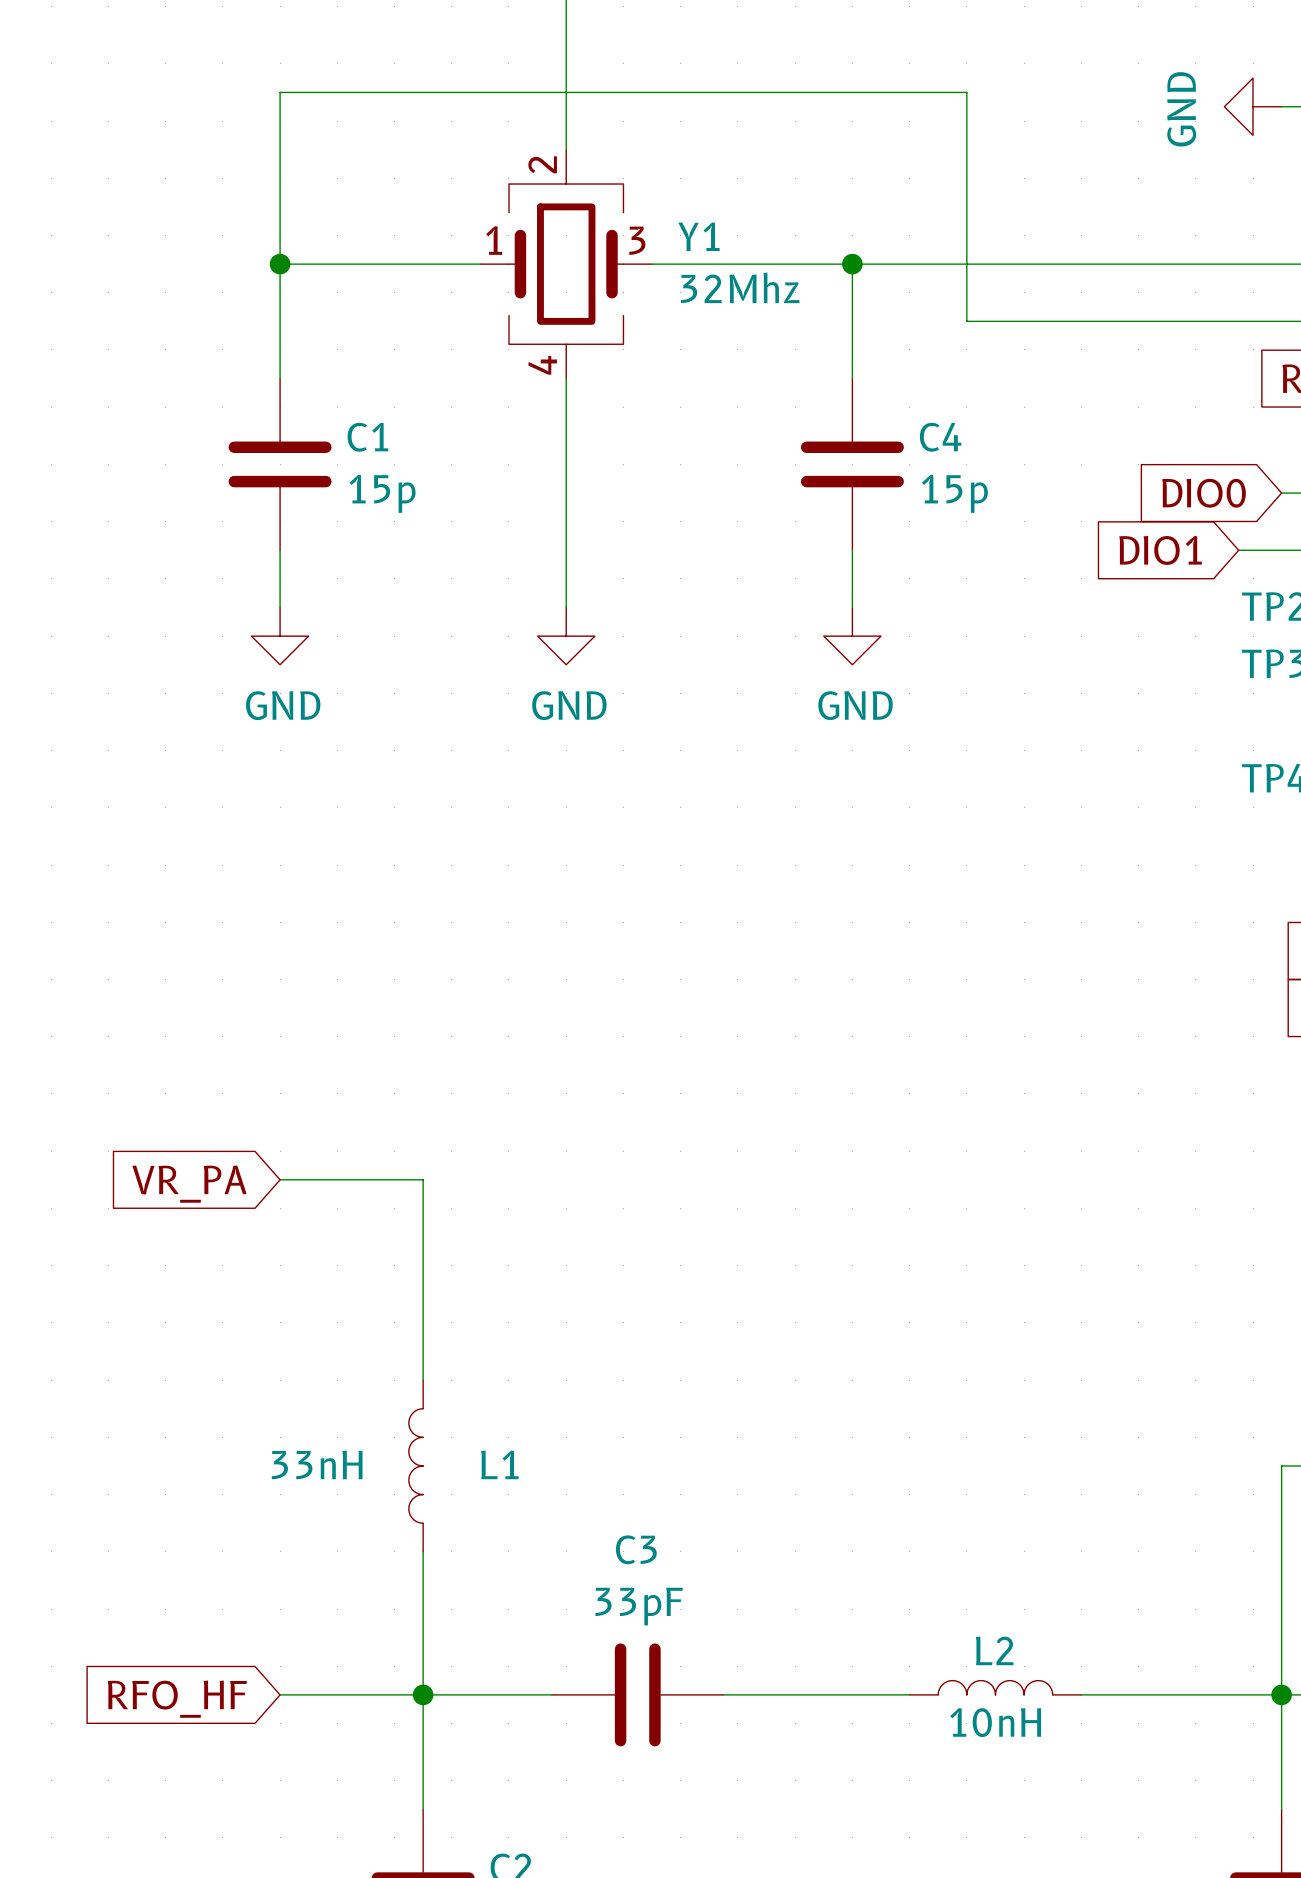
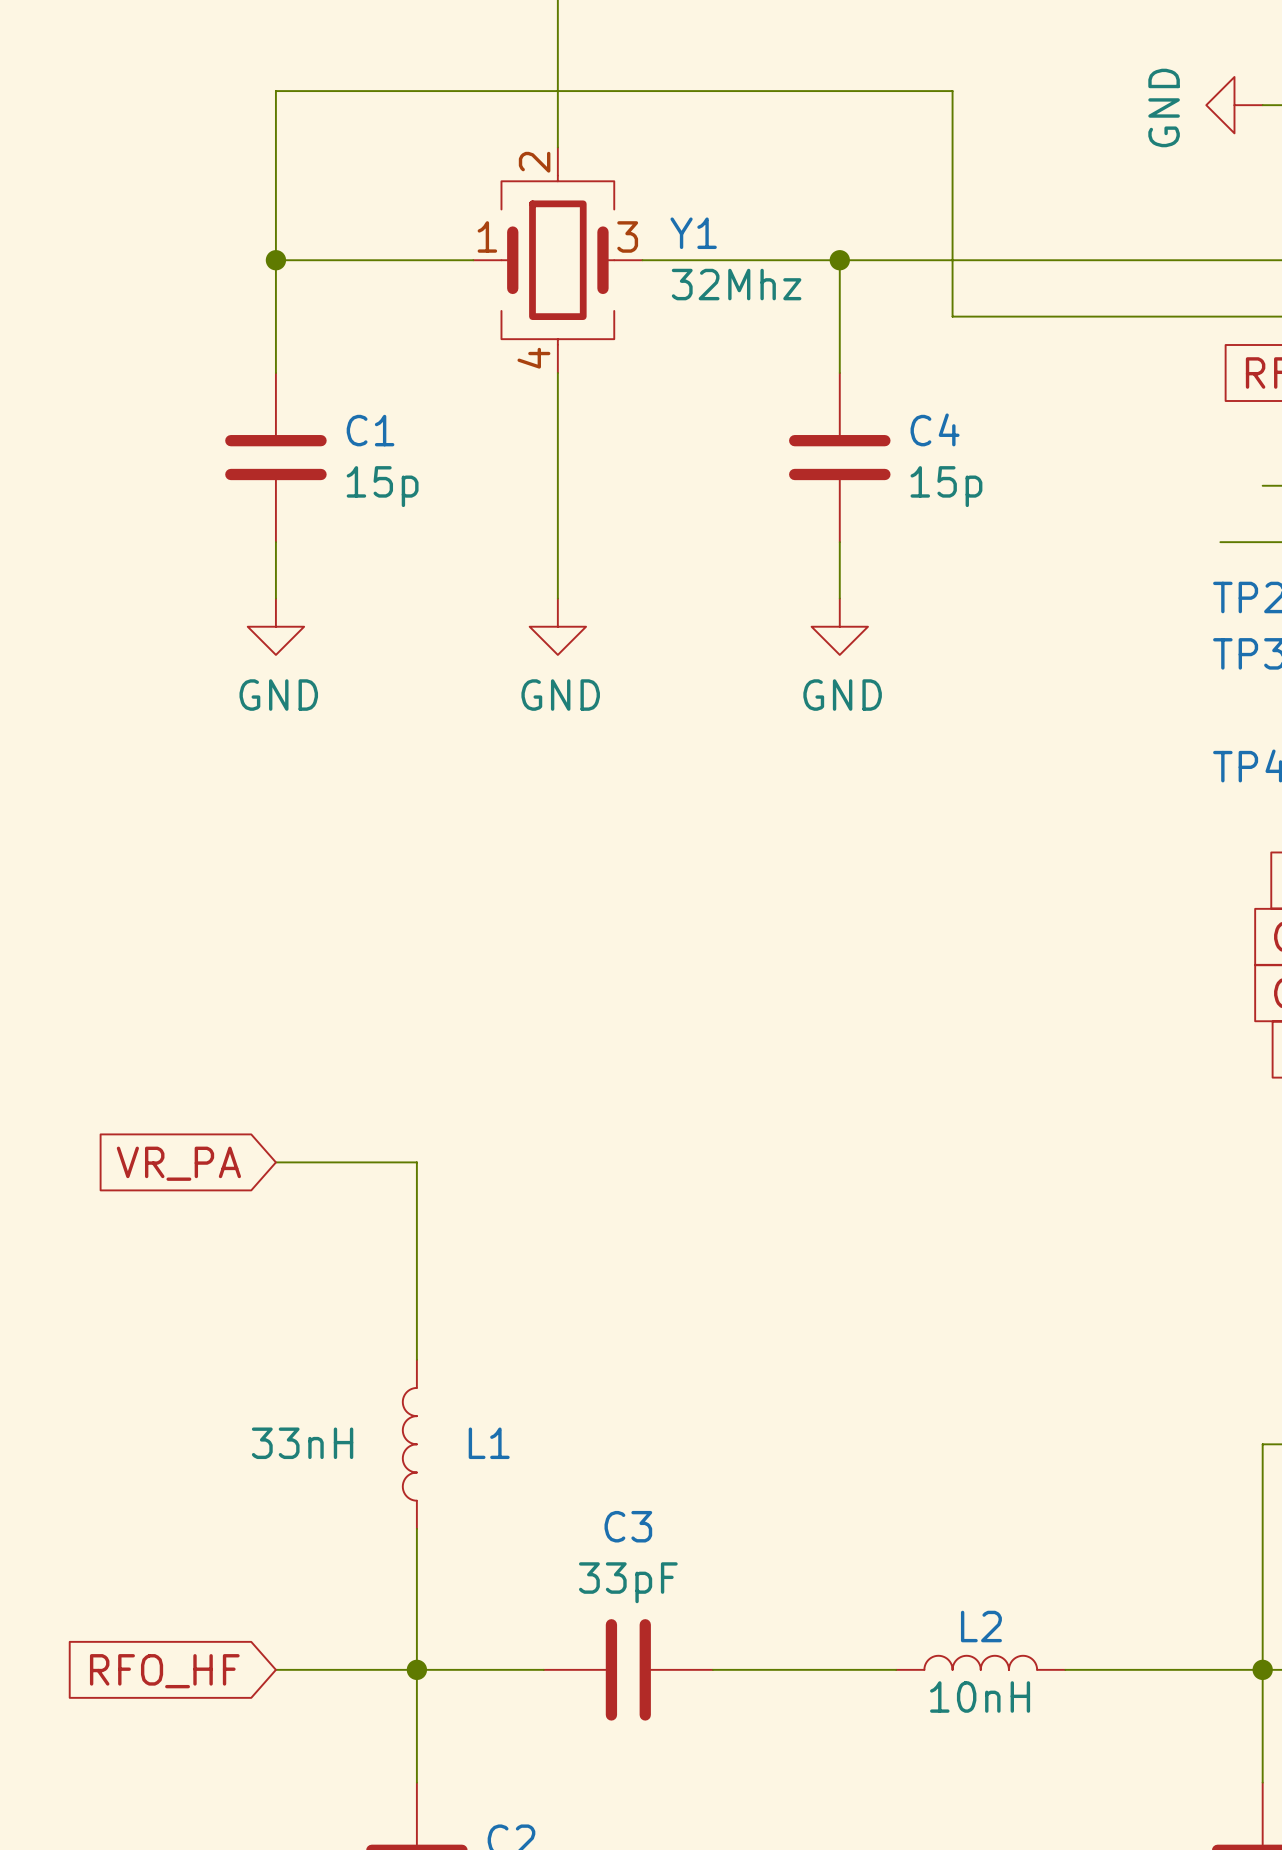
global label: DIO0 (1204, 493) -> none
global label: DIO1 (1160, 550) -> none

